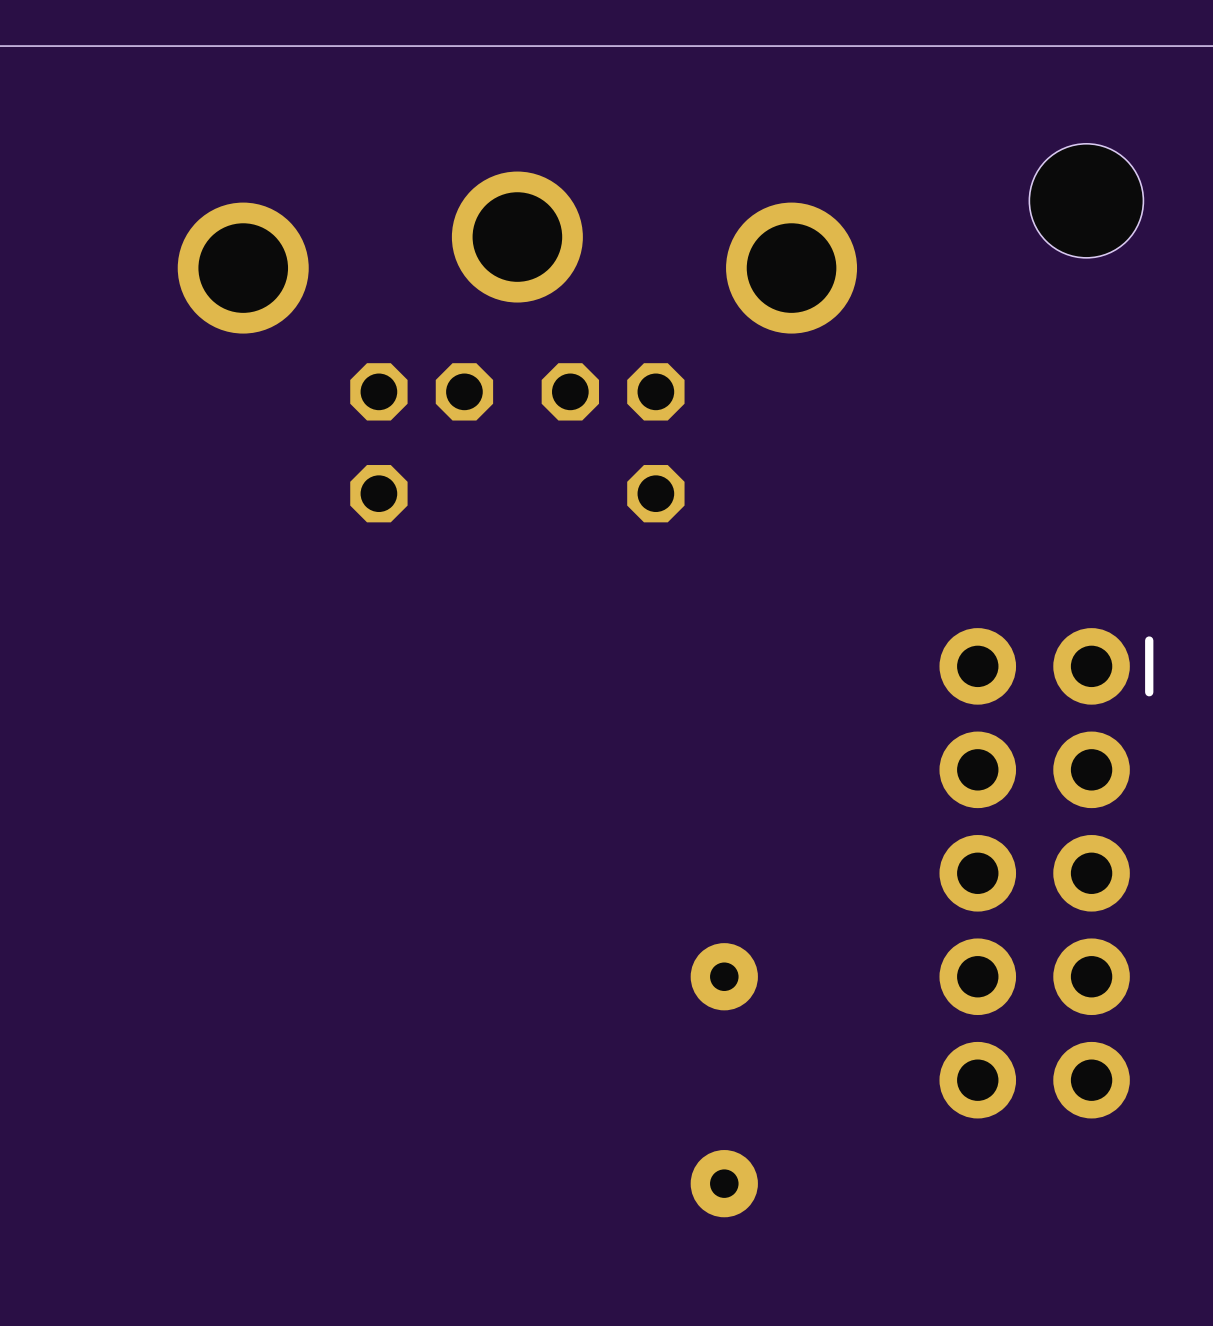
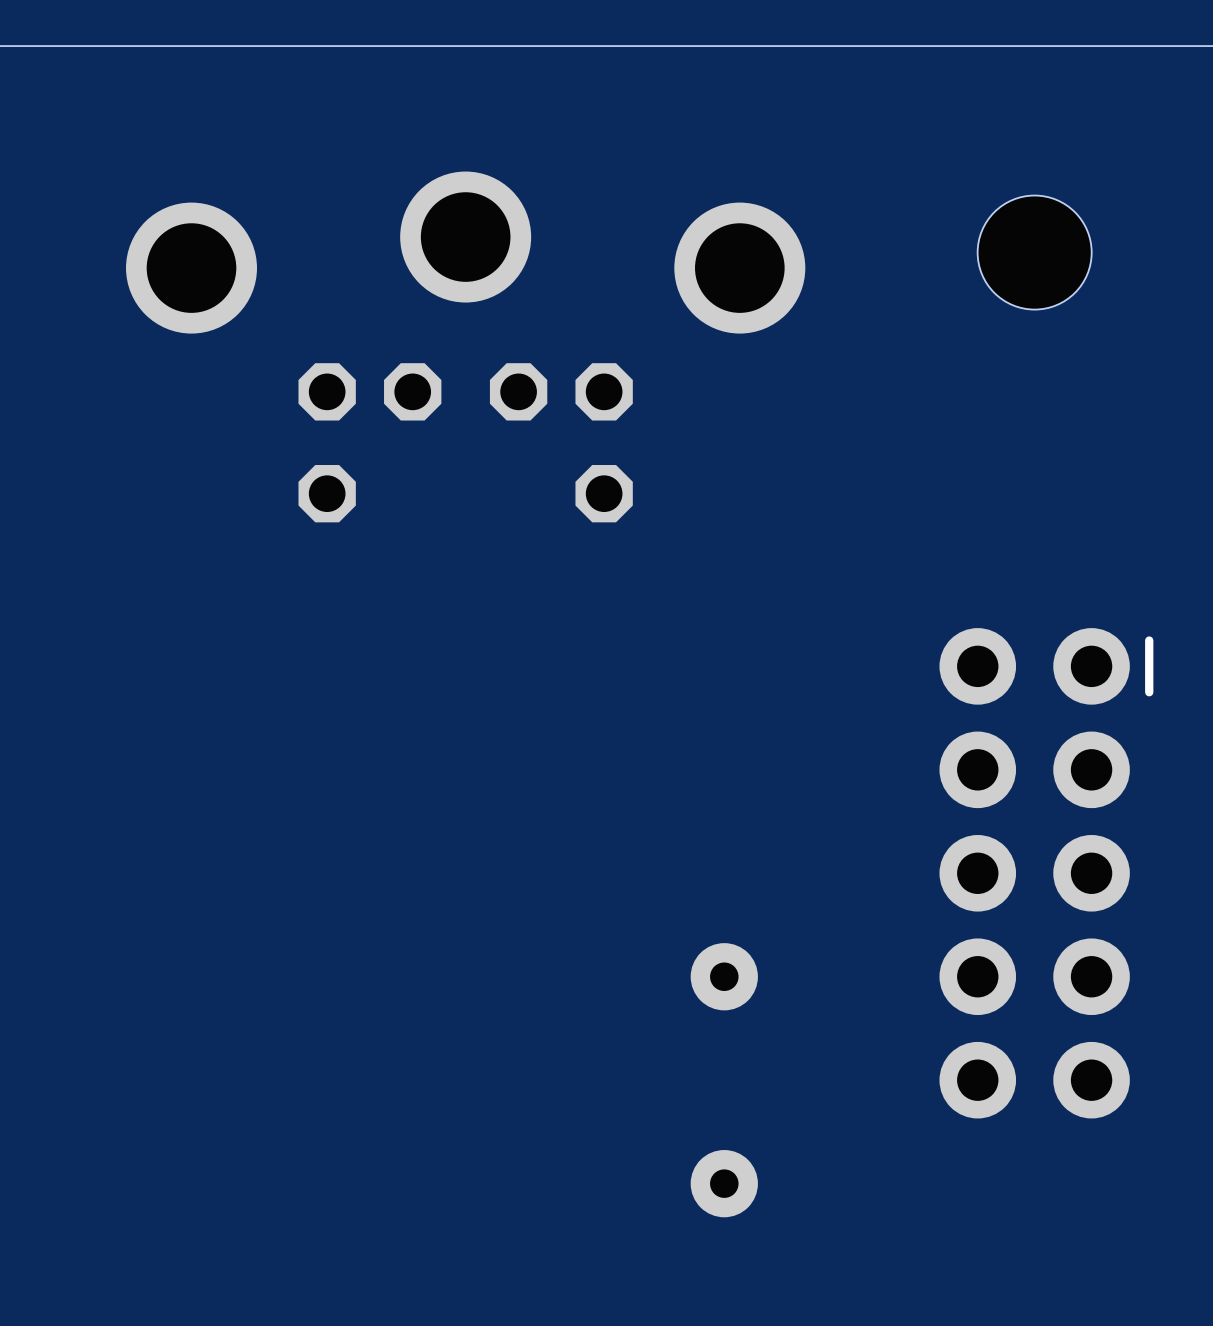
part position: (1086, 200) -> (1034, 252)
part position: (517, 346) -> (465, 346)

